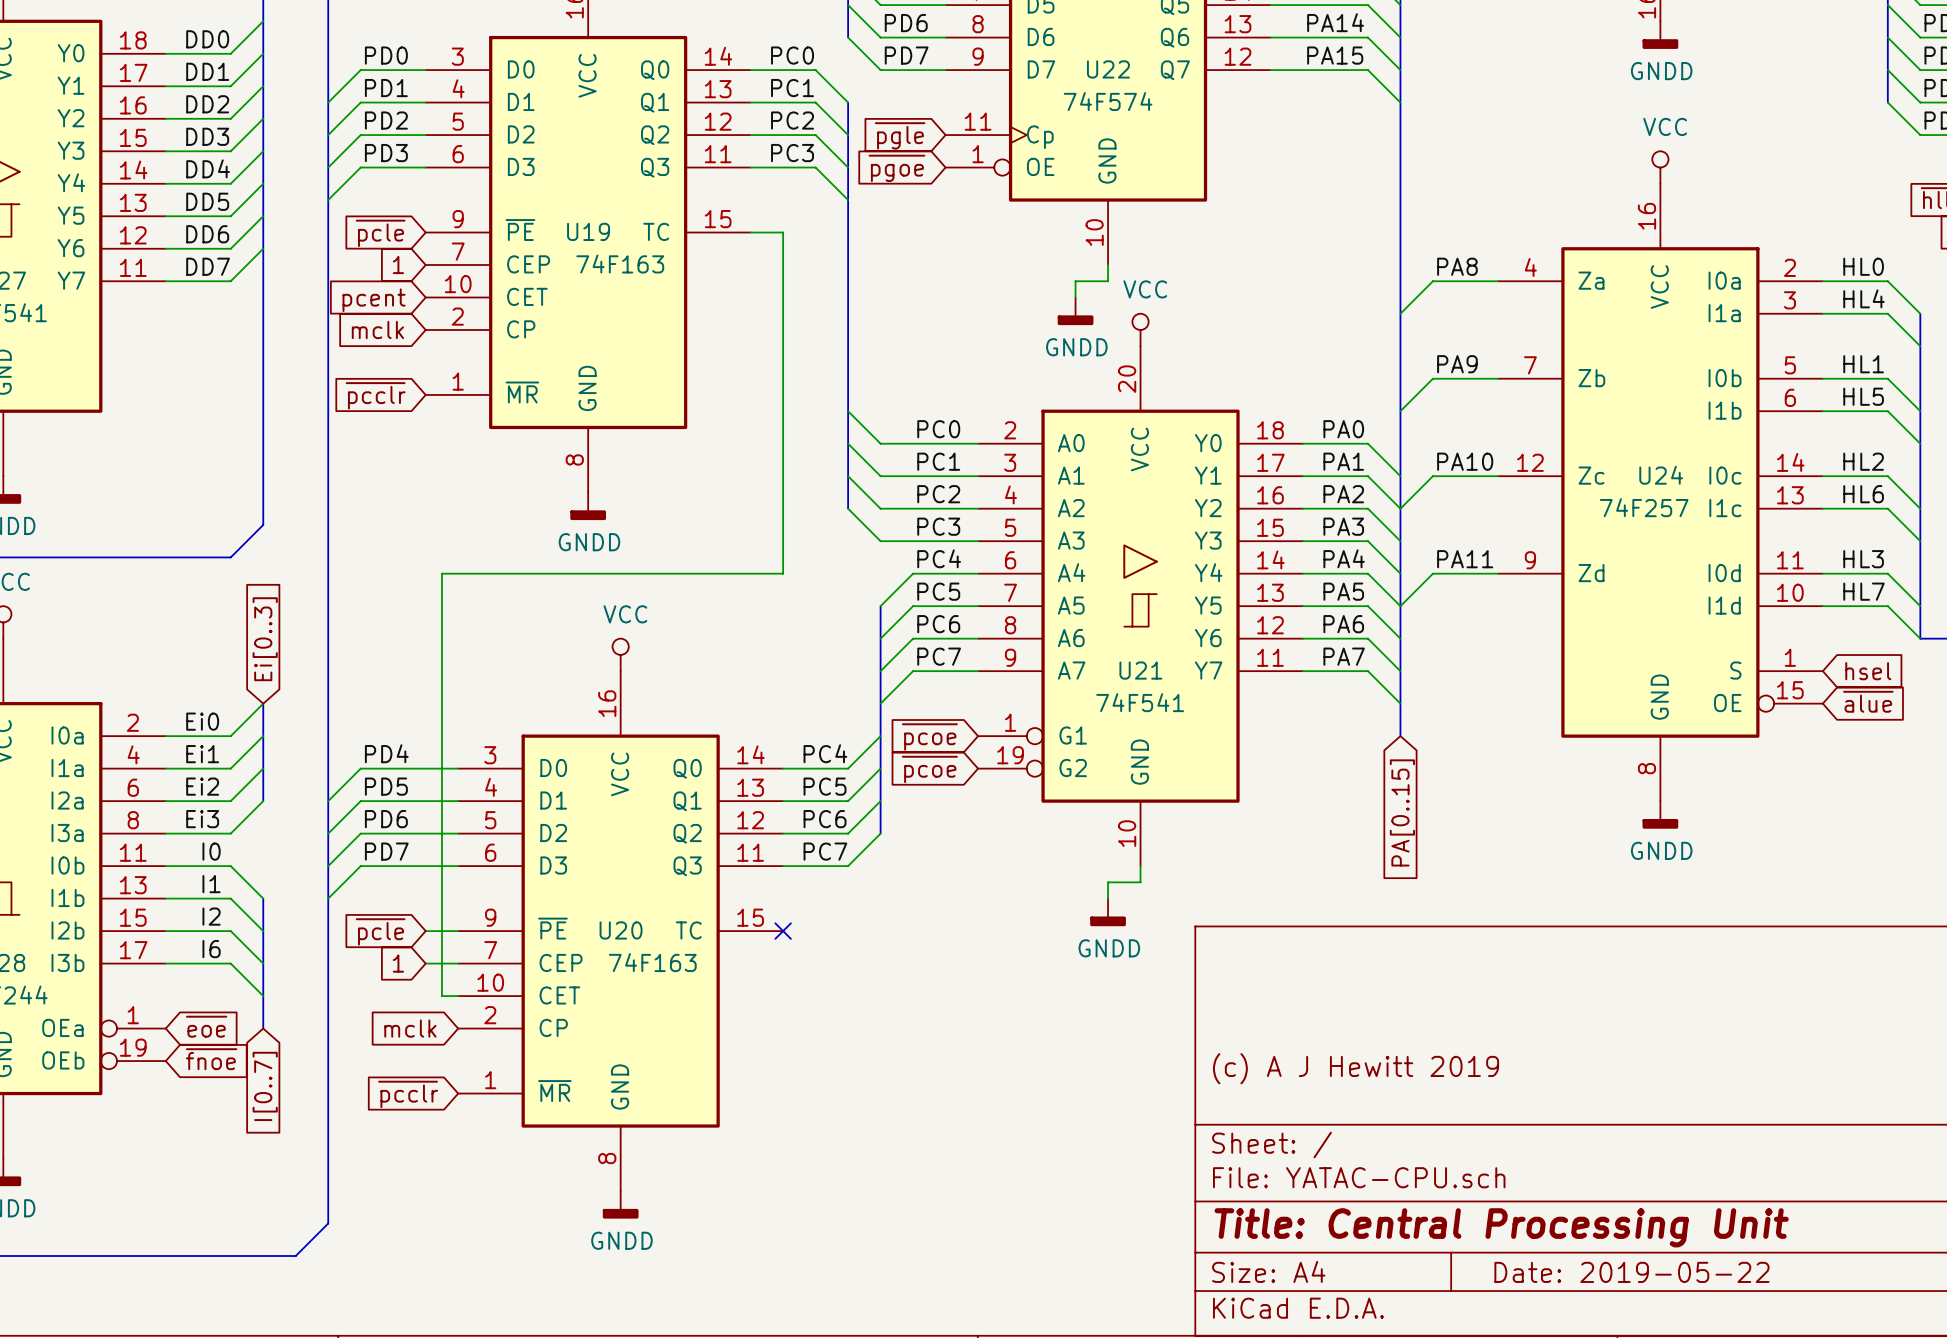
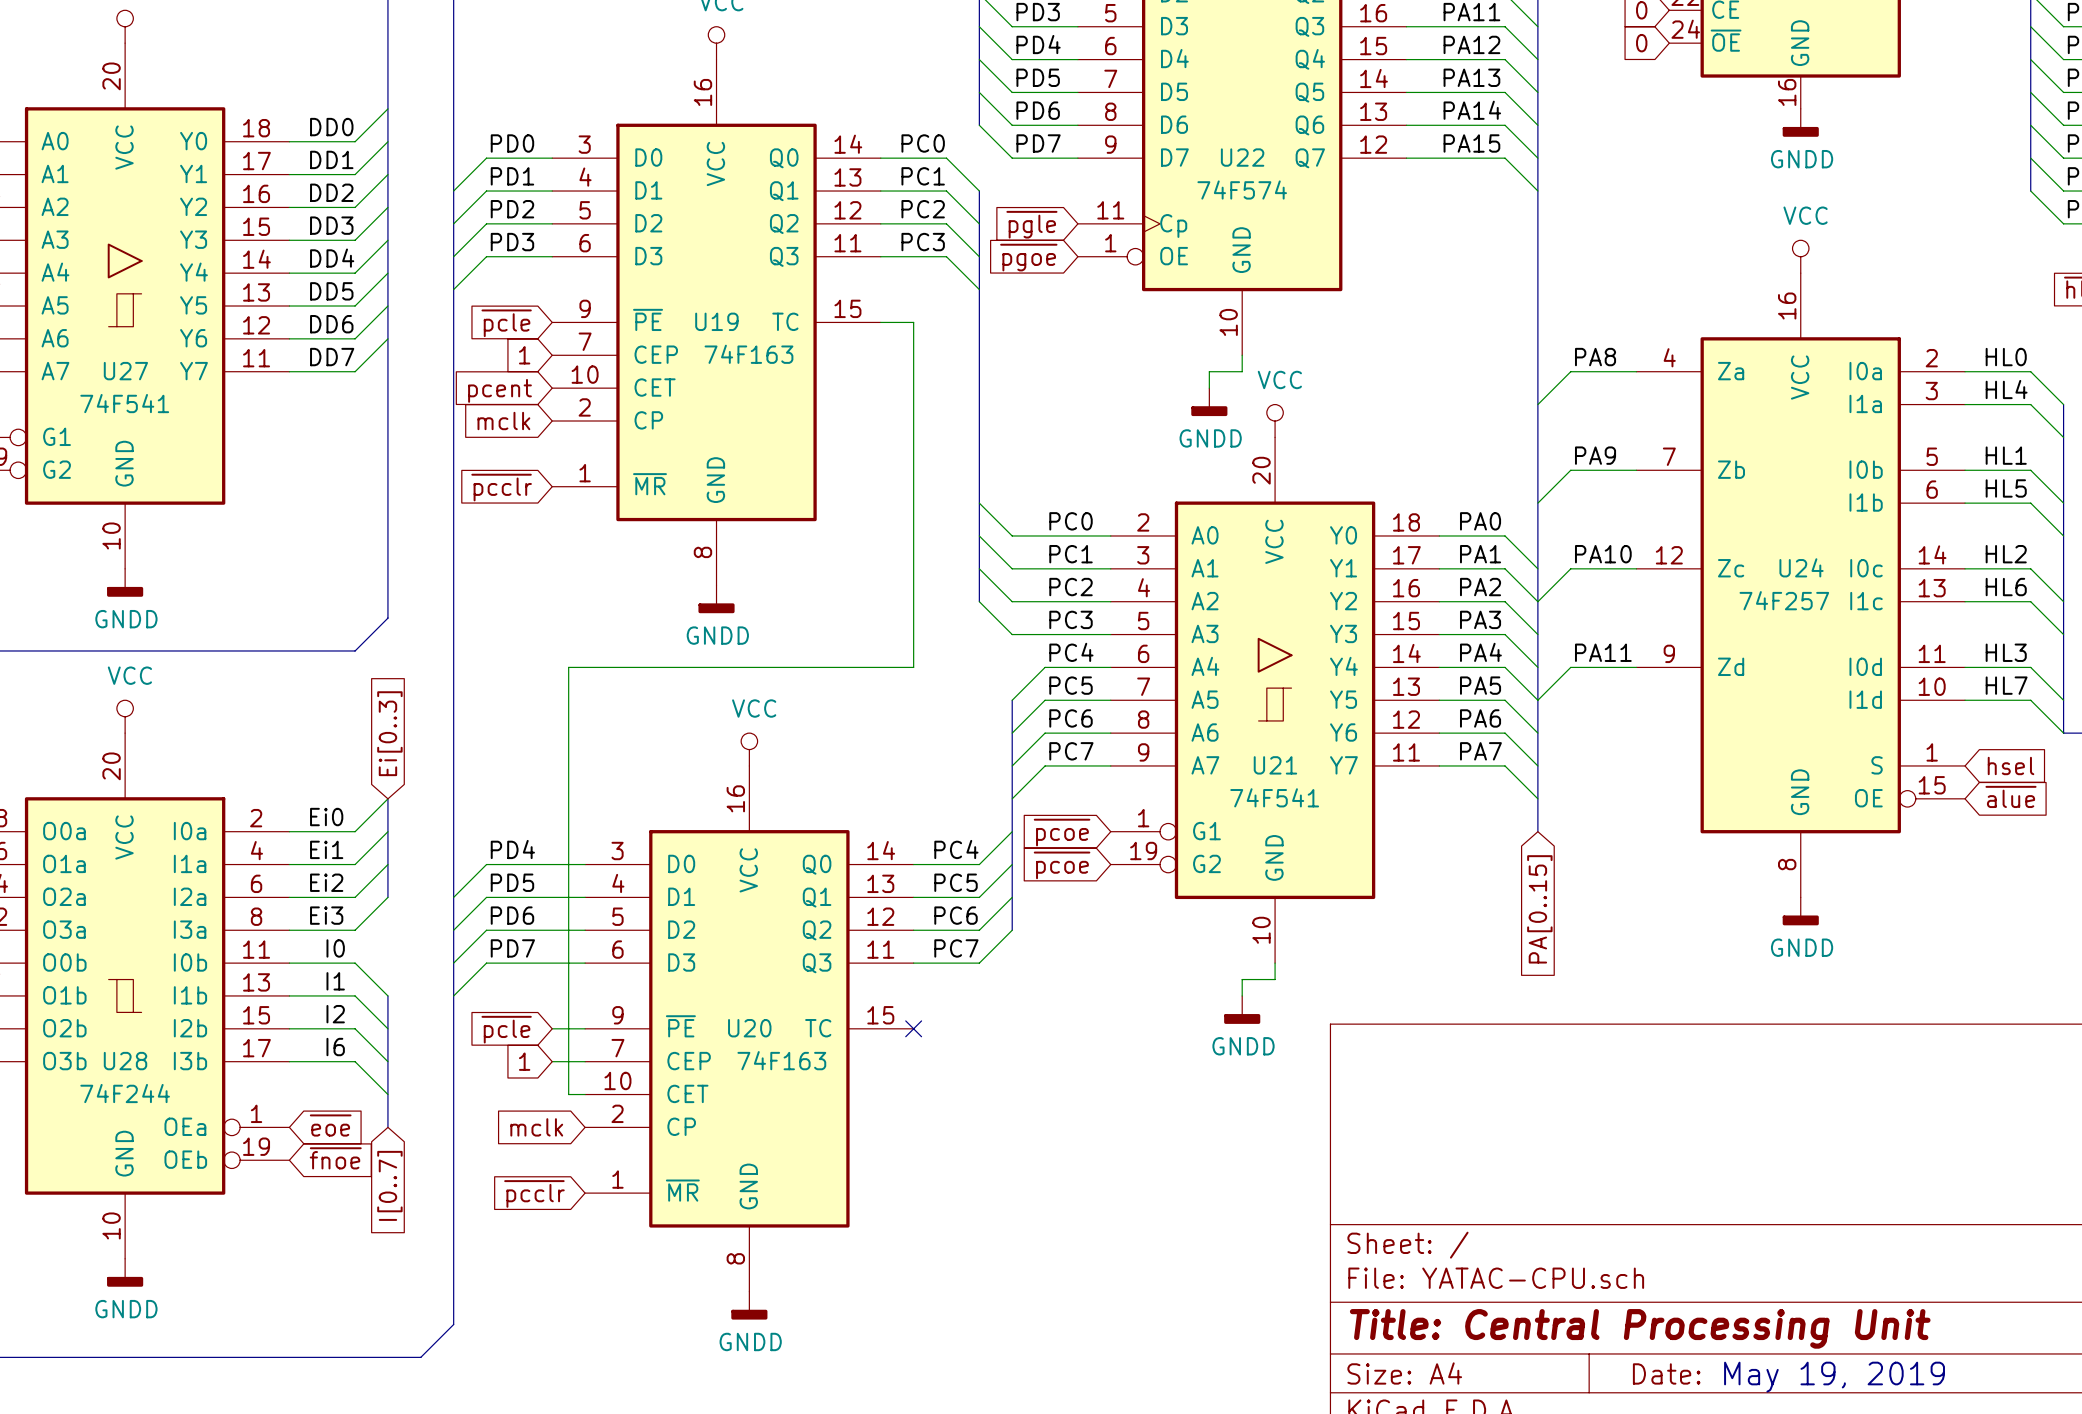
title block: (c) A J Hewitt 2019 (1356, 1068) -> none
title block: Date: 2019-05-22 (1631, 1272) -> Date: (1666, 1373)
text: none -> May 19, 2019 (1834, 1377)

